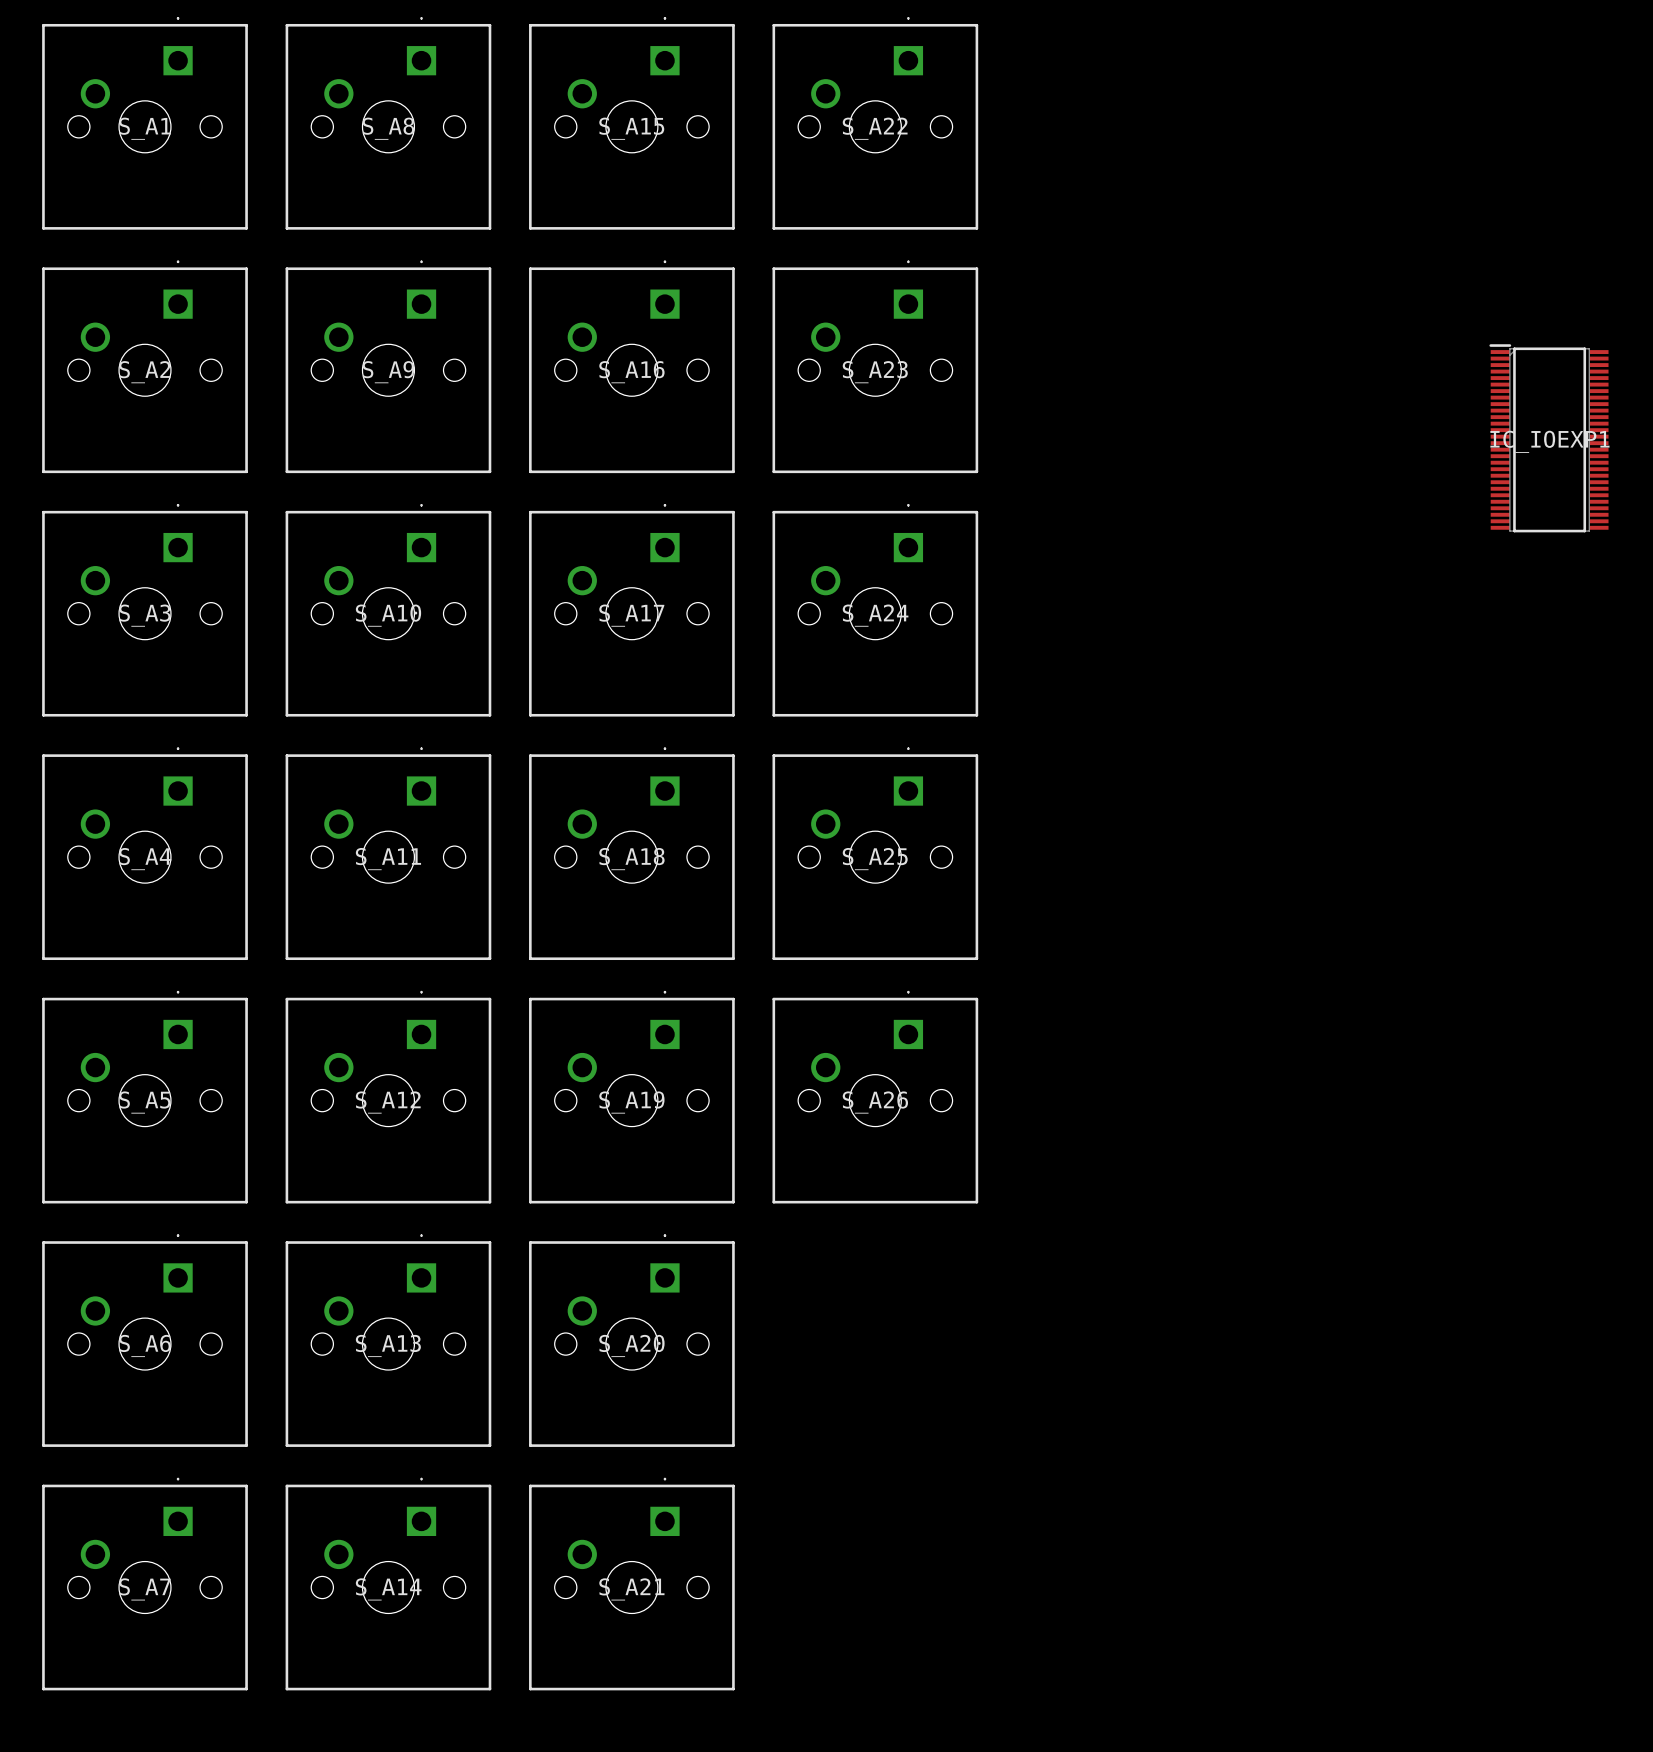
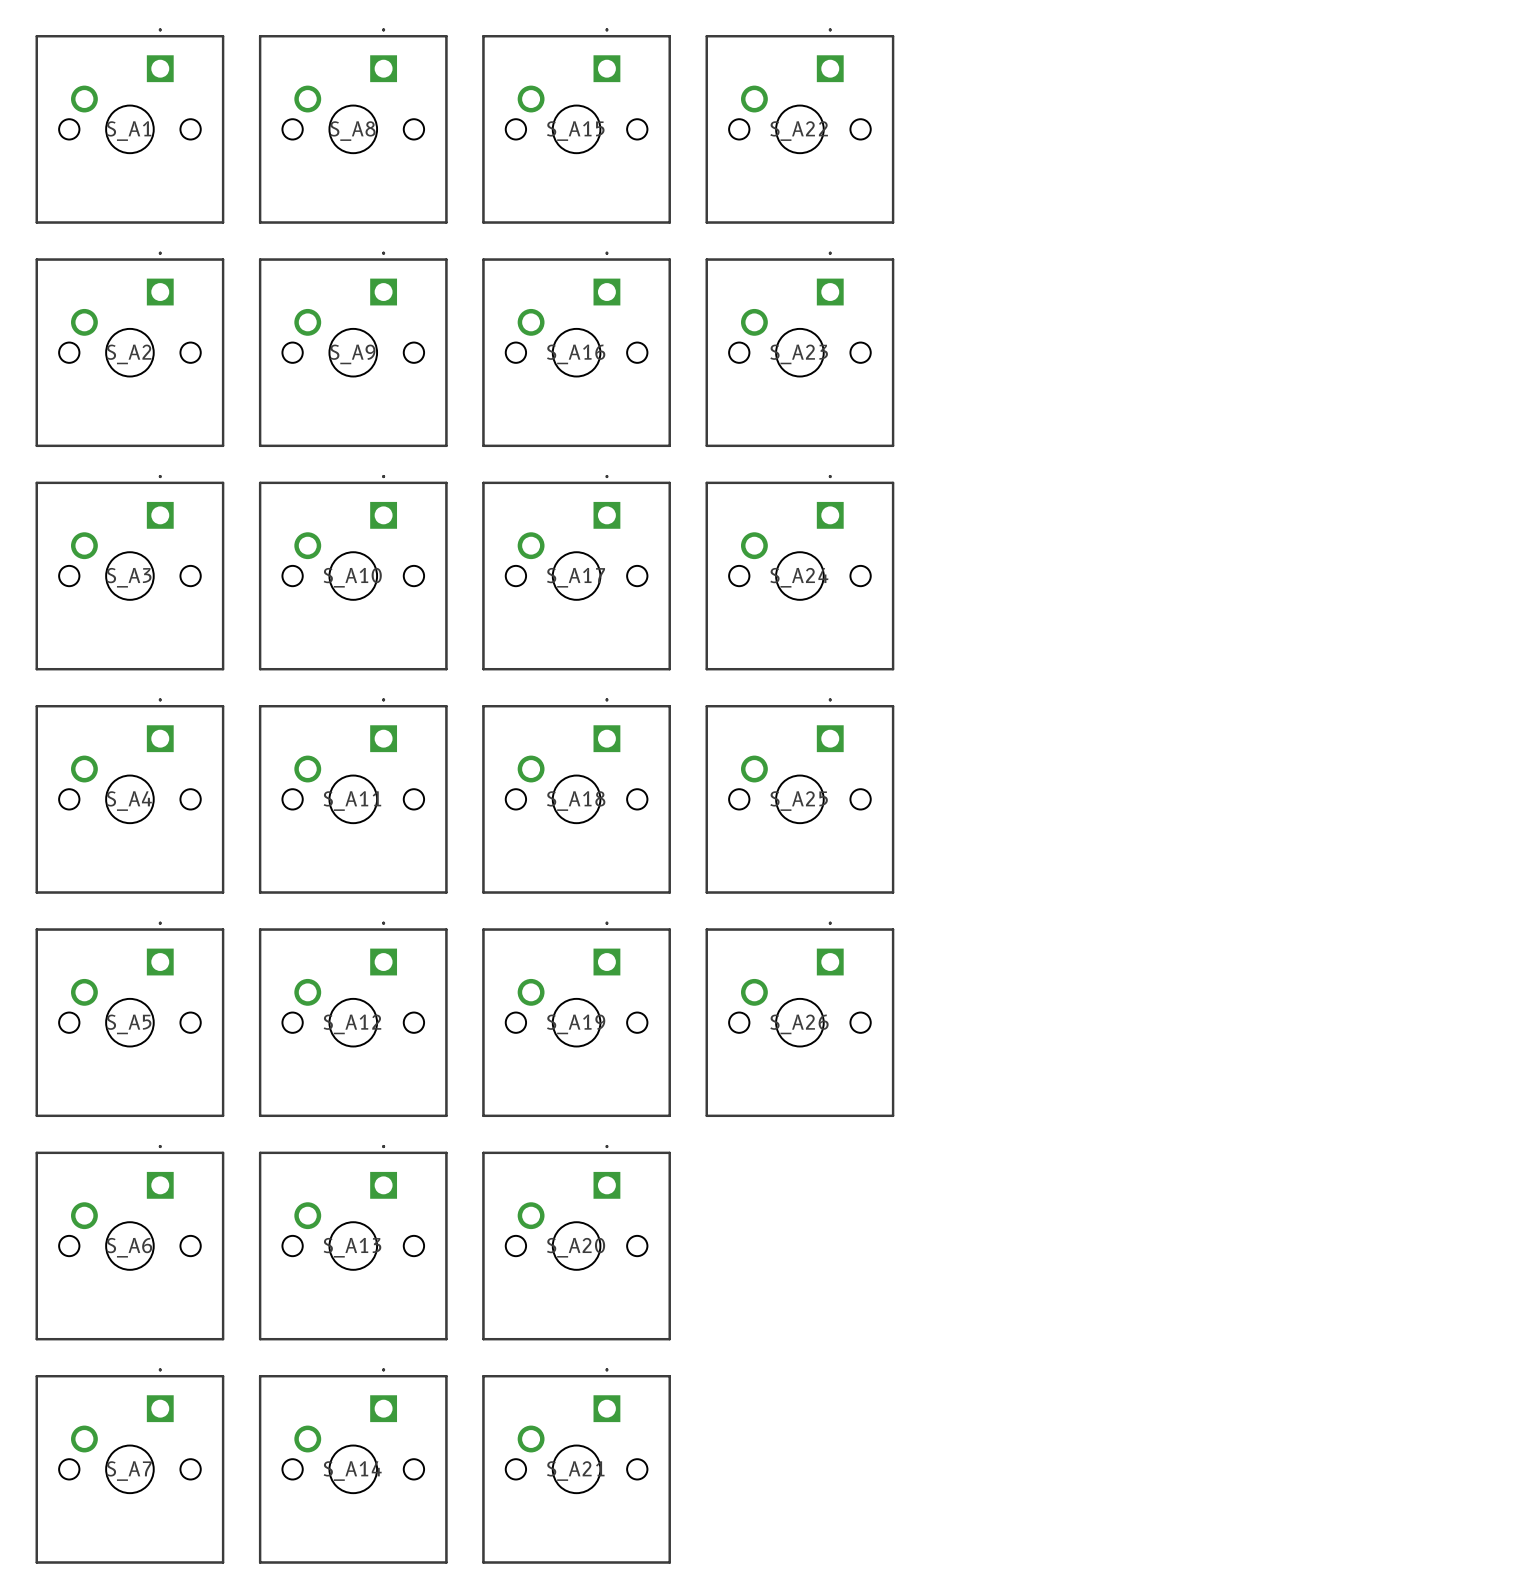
IC_IOEXP1: (1548, 438) -> none

